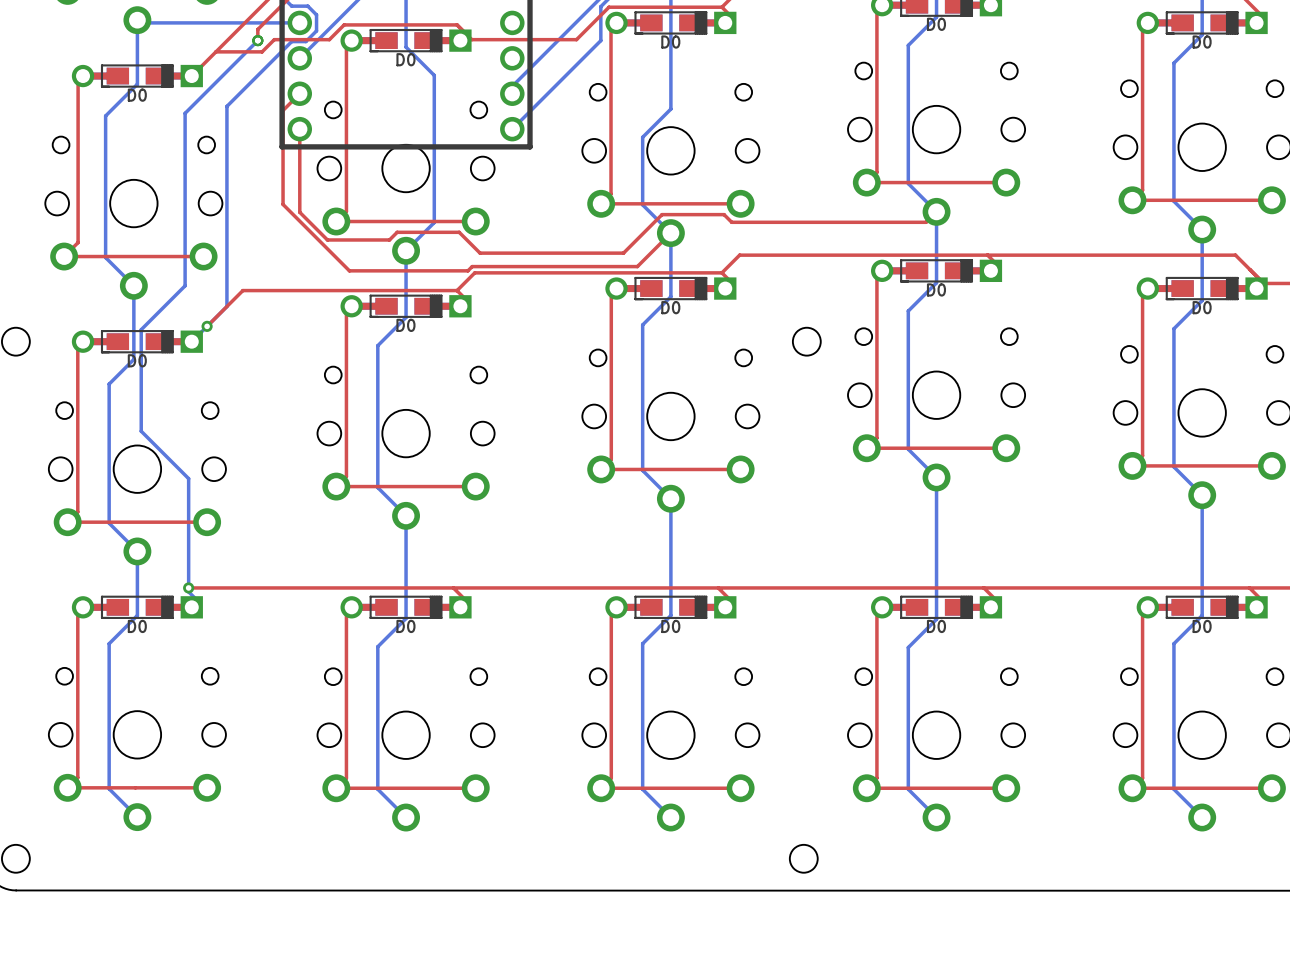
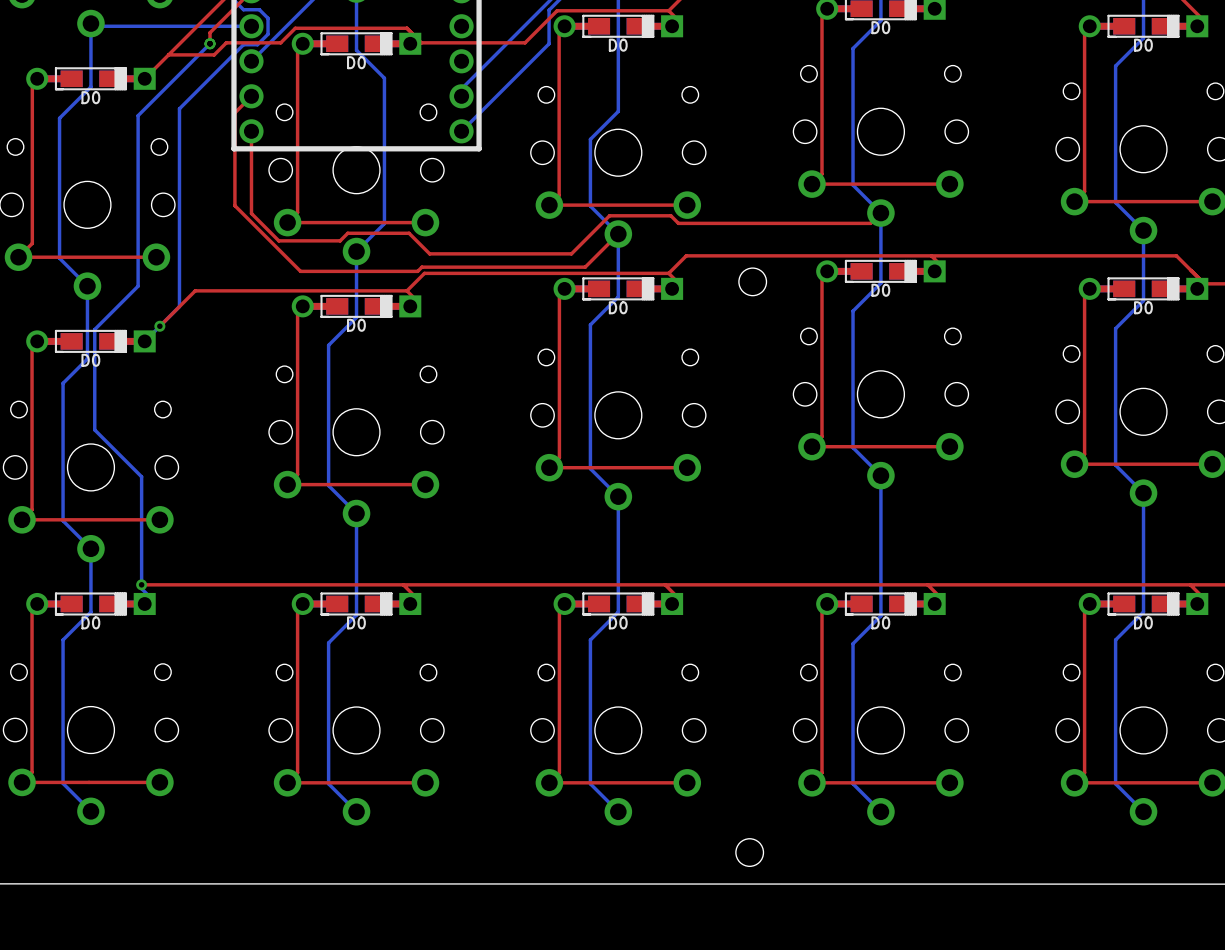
round board edge position: (806, 341) -> (752, 281)

